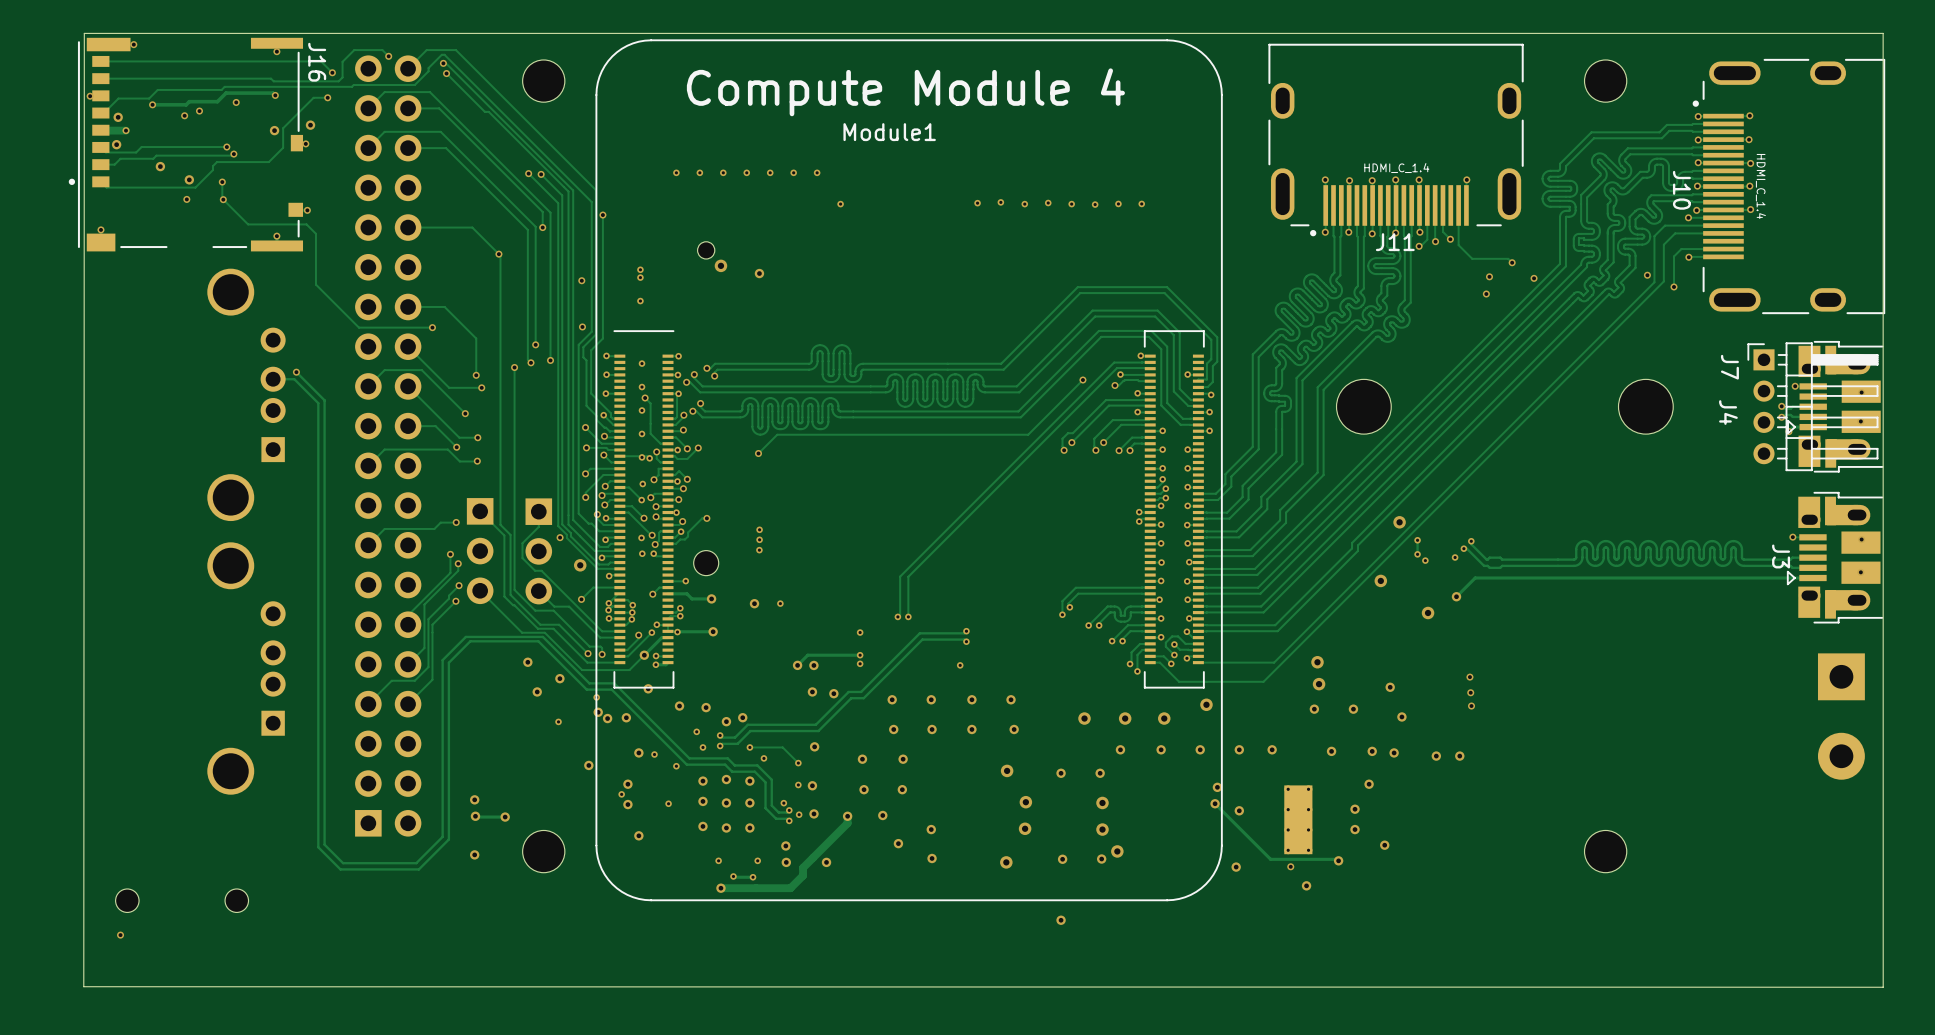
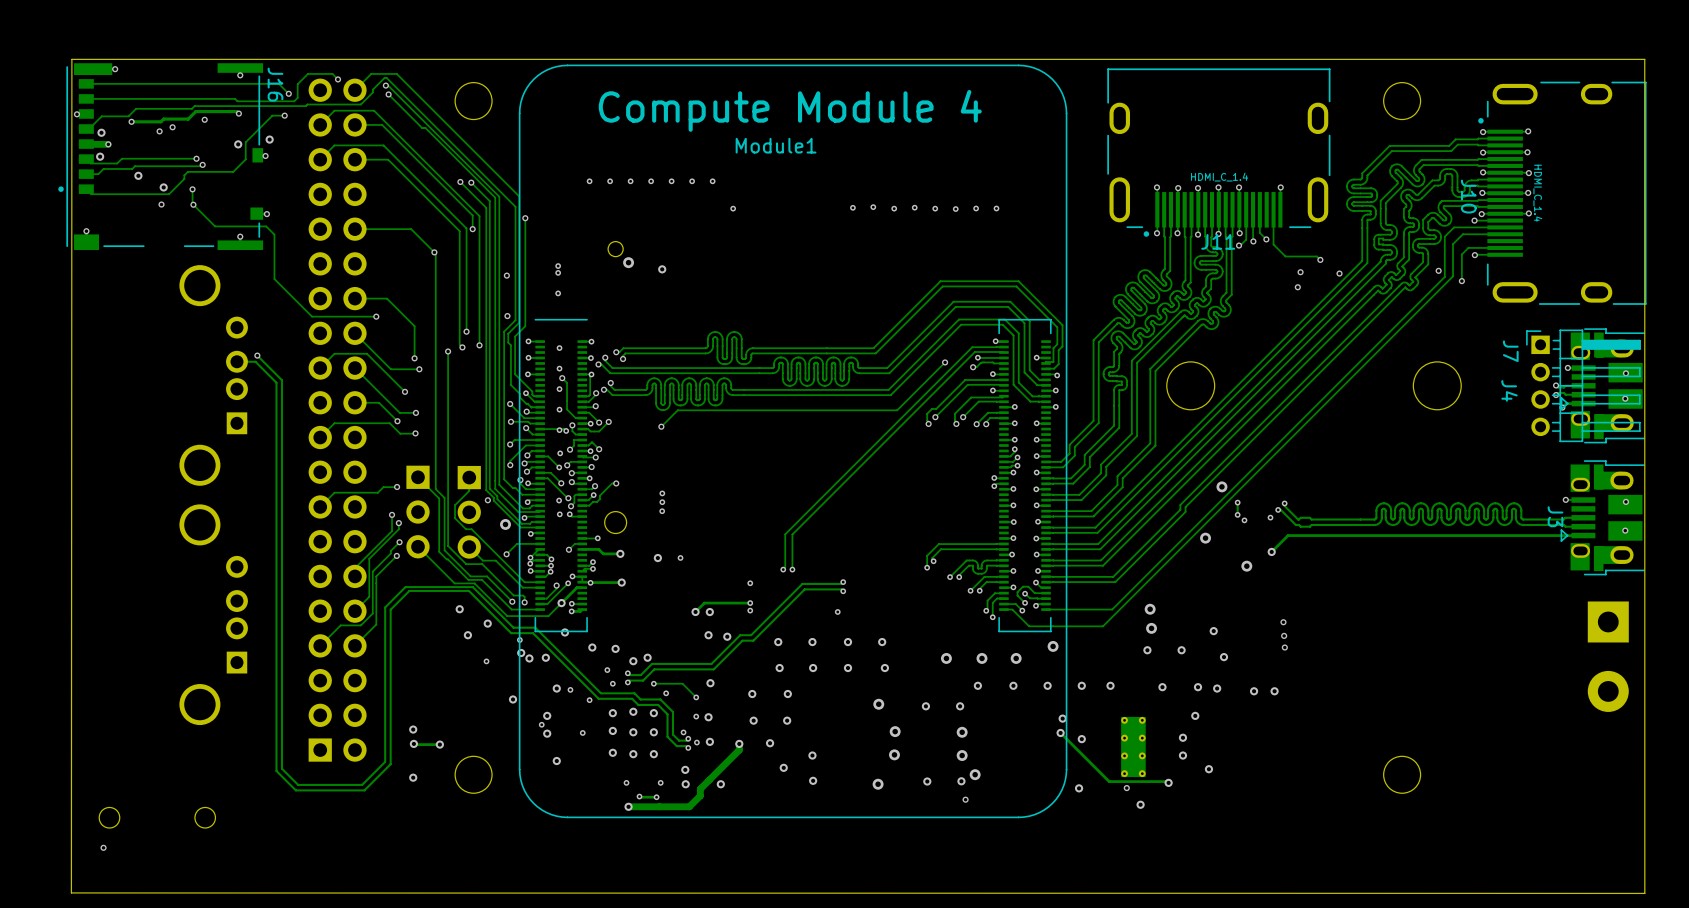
via: none -> (965, 799)
via: (1061, 920) -> none

